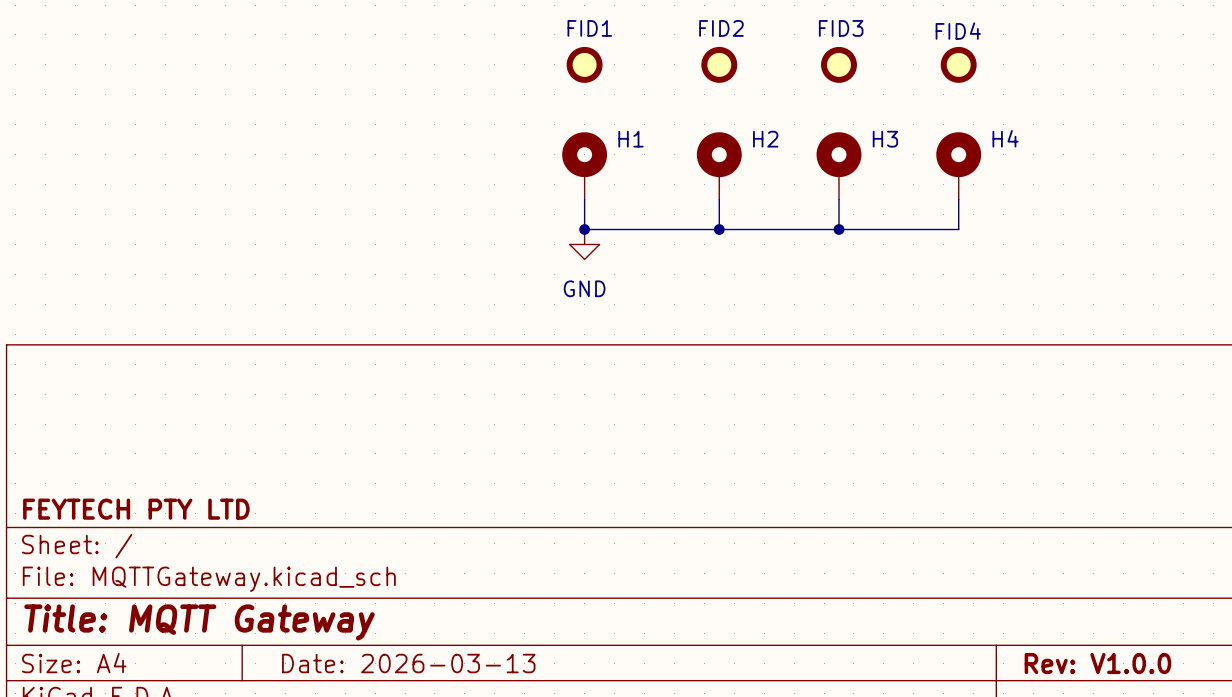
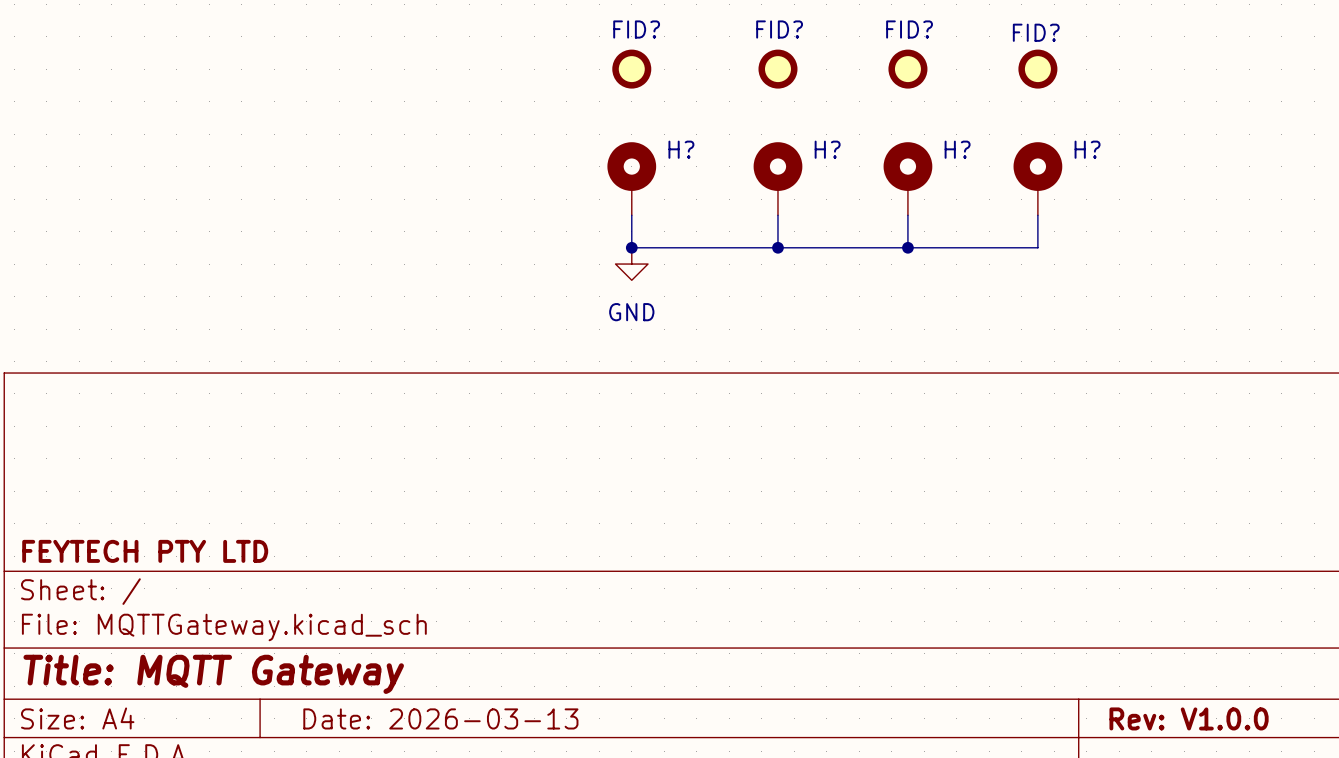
FID1 name: FID1 (589, 28) -> FID? (636, 29)
FID2 name: FID2 (721, 28) -> FID? (779, 29)
FID3 name: FID3 (841, 28) -> FID? (909, 29)
FID4 name: FID4 (958, 31) -> FID? (1036, 32)
H4 name: H4 (1005, 138) -> H? (1087, 149)
H1 name: H1 (631, 139) -> H? (681, 149)
H2 name: H2 (765, 139) -> H? (827, 149)
H3 name: H3 (885, 139) -> H? (957, 149)

